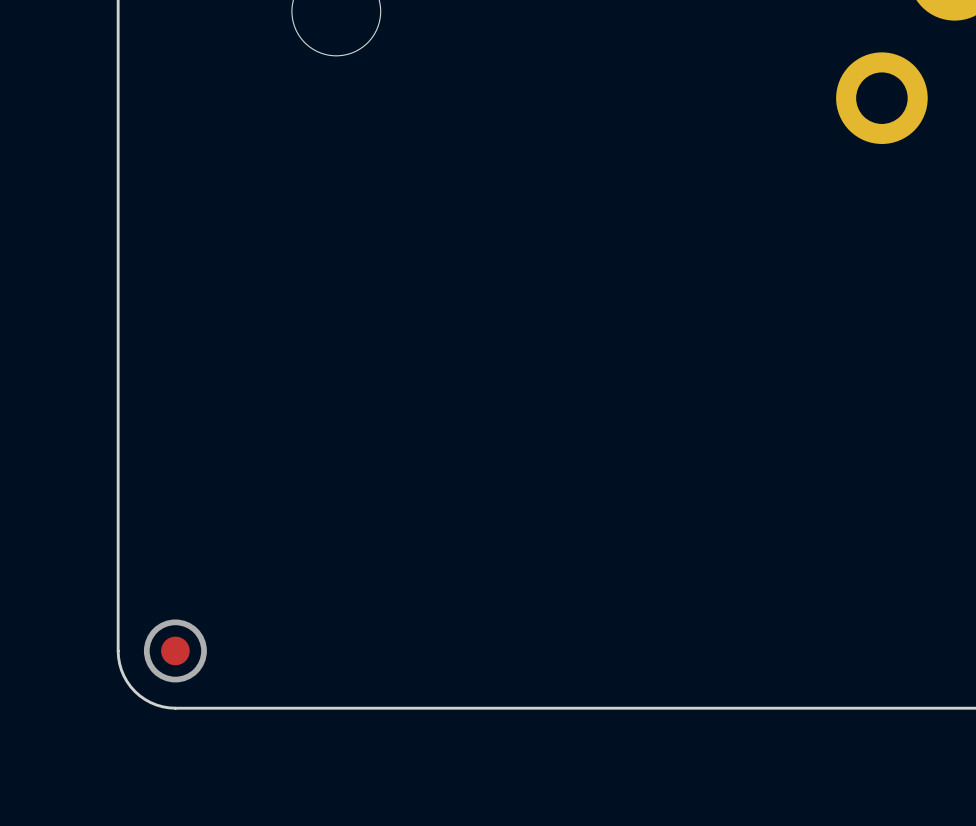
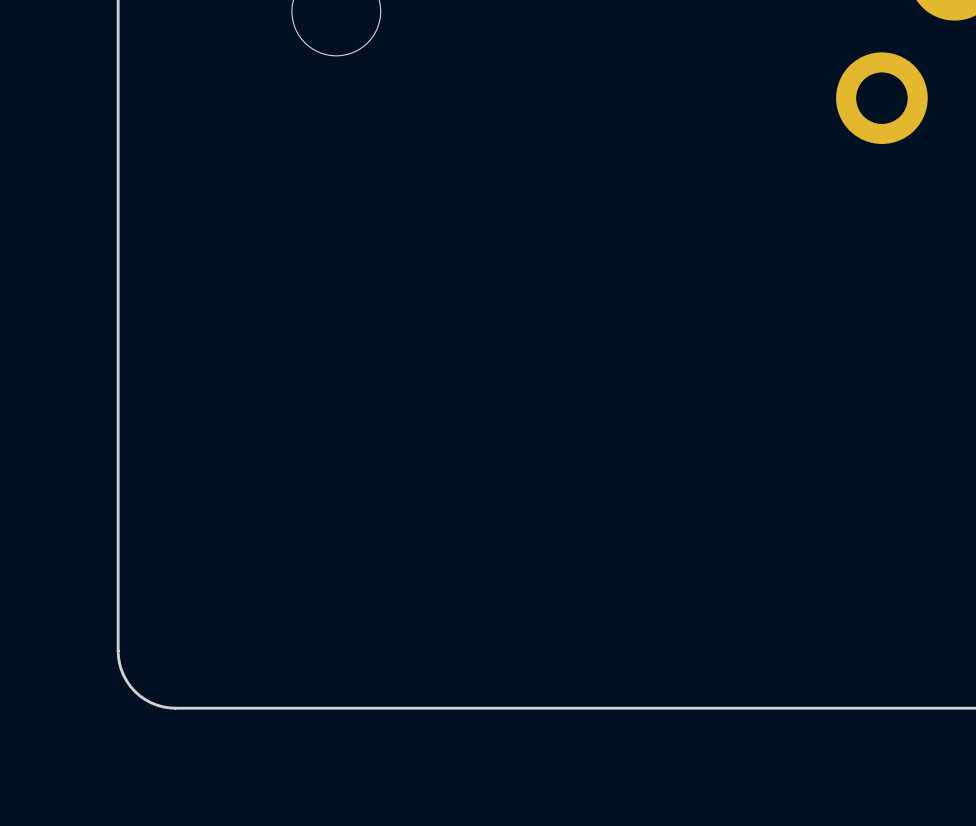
part: (175, 650) -> none

